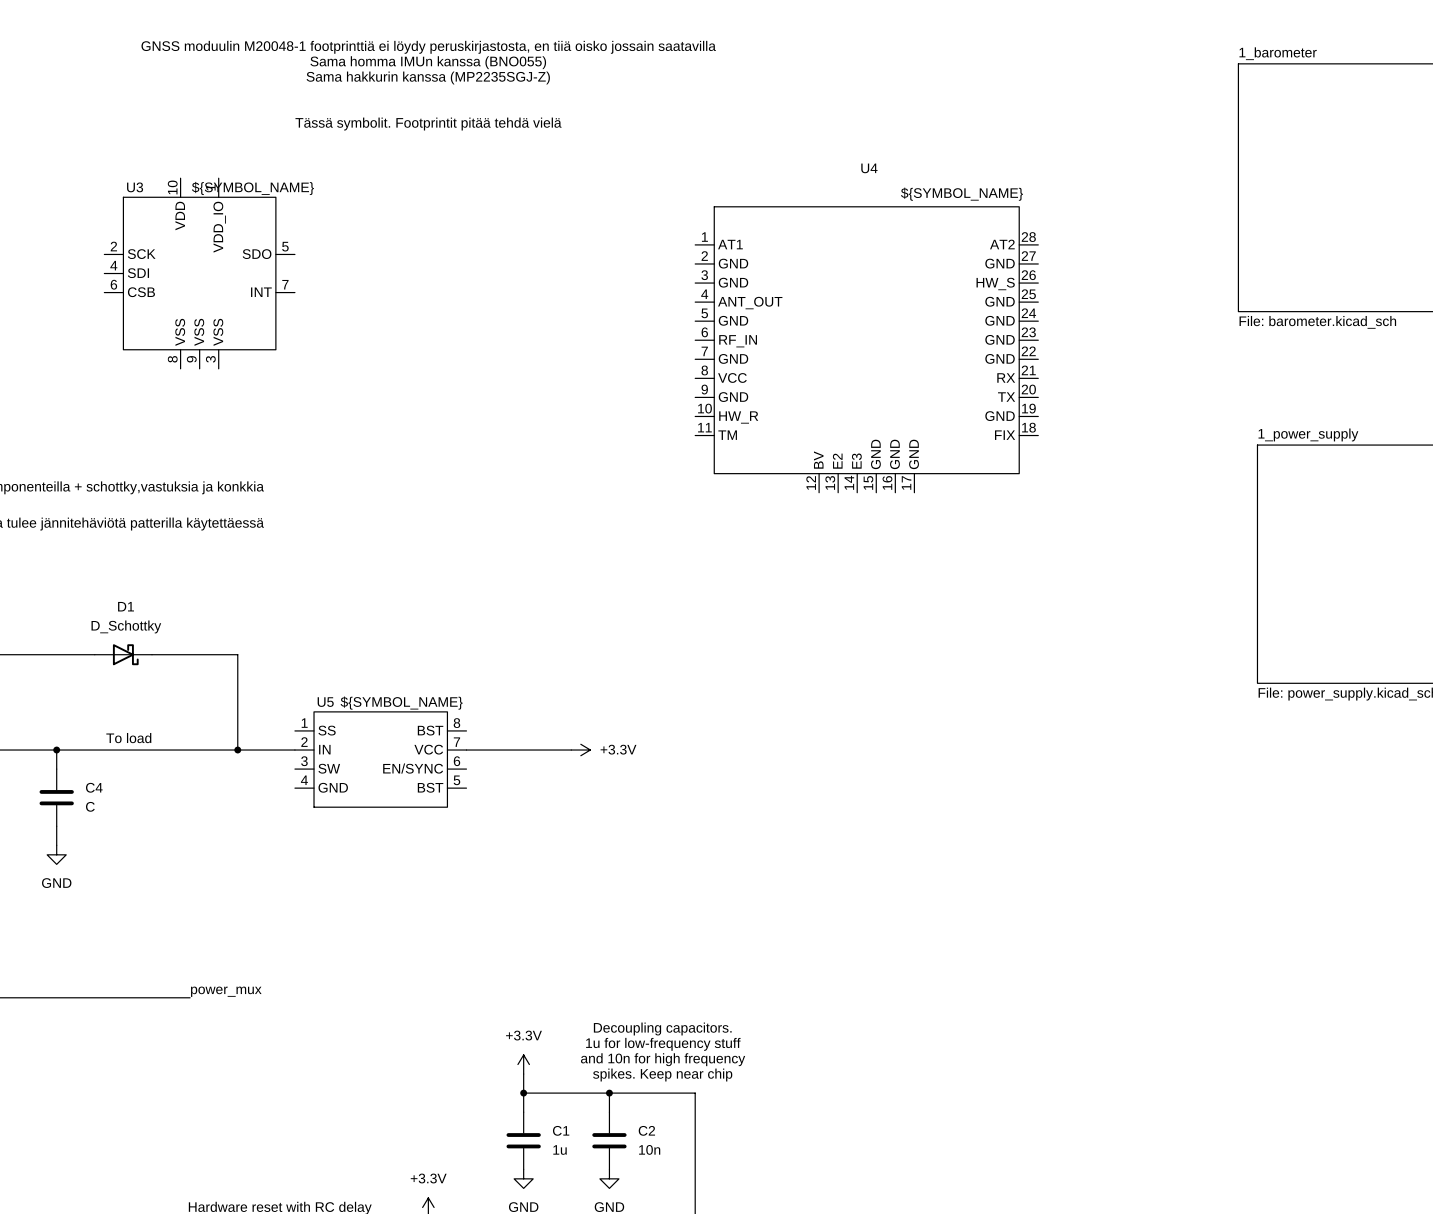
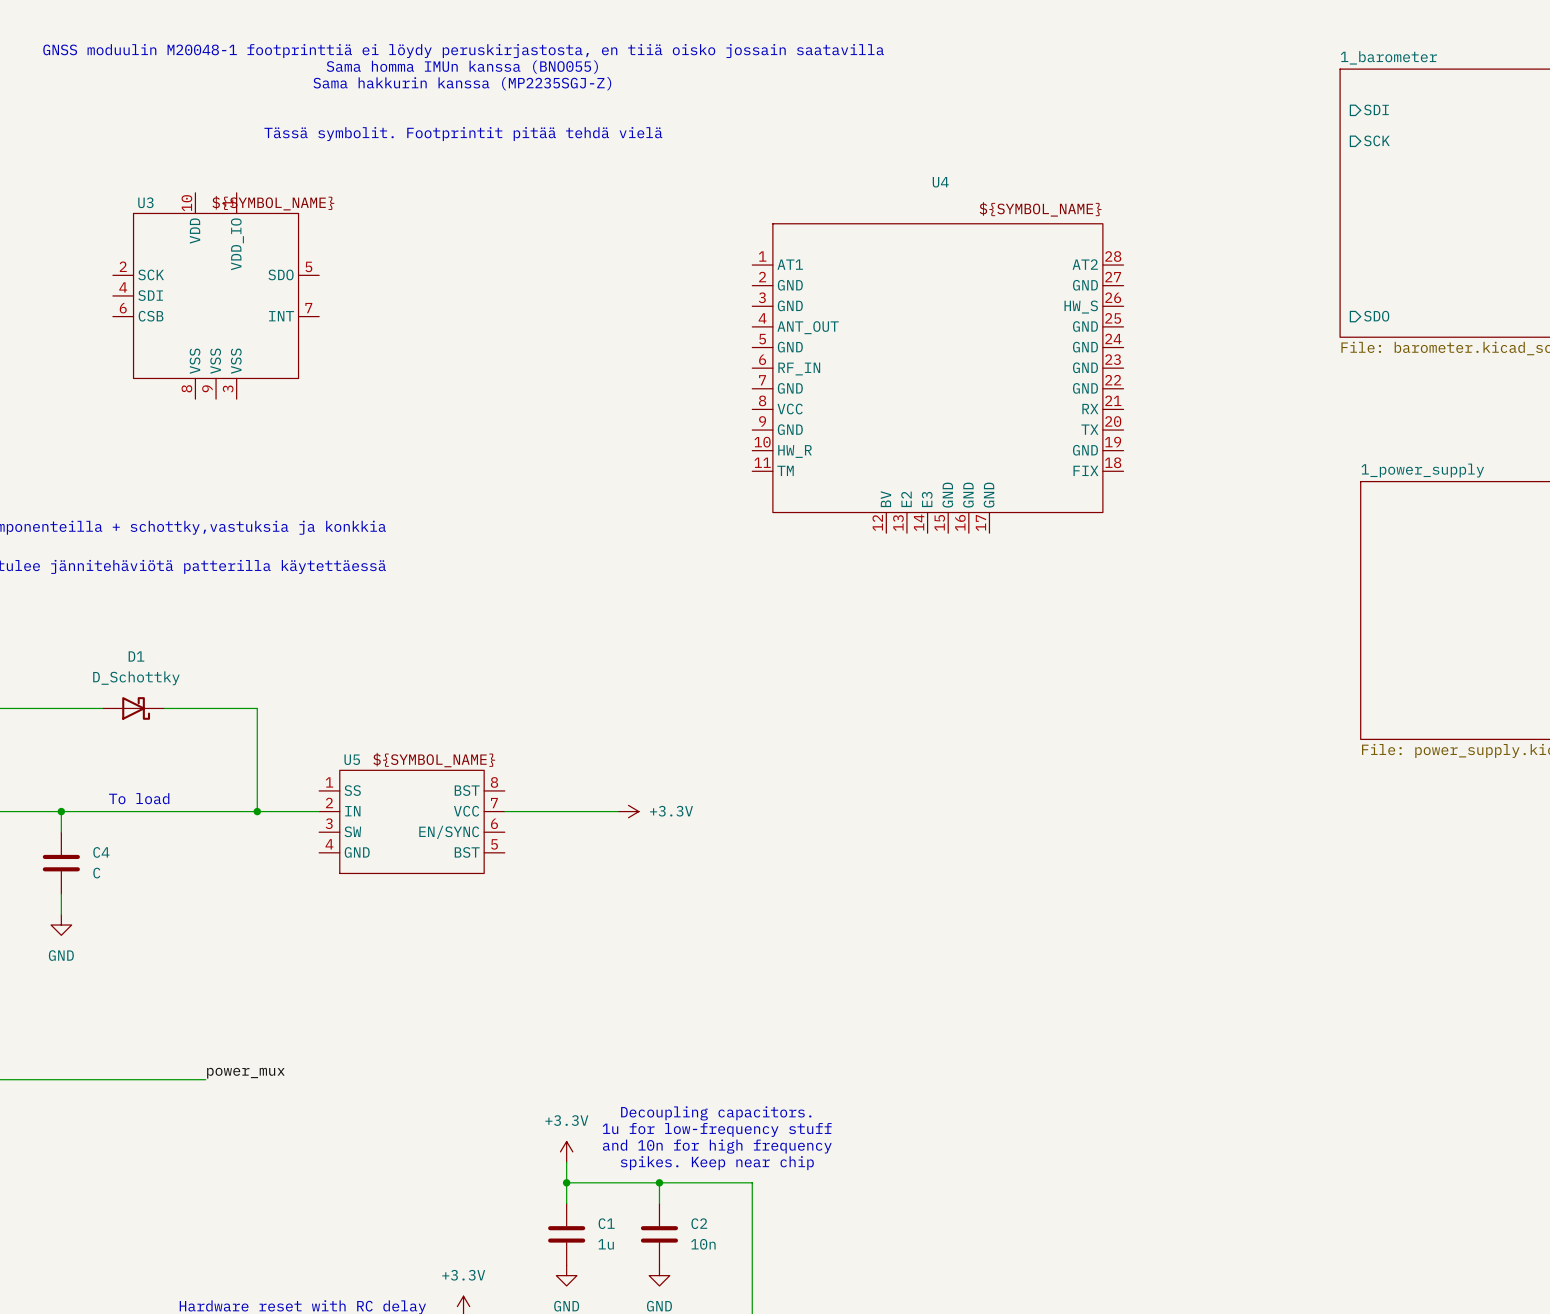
sheet pin: none -> SDI (1376, 109)
sheet pin: none -> SCK (1376, 140)
sheet pin: none -> SDO (1376, 316)

